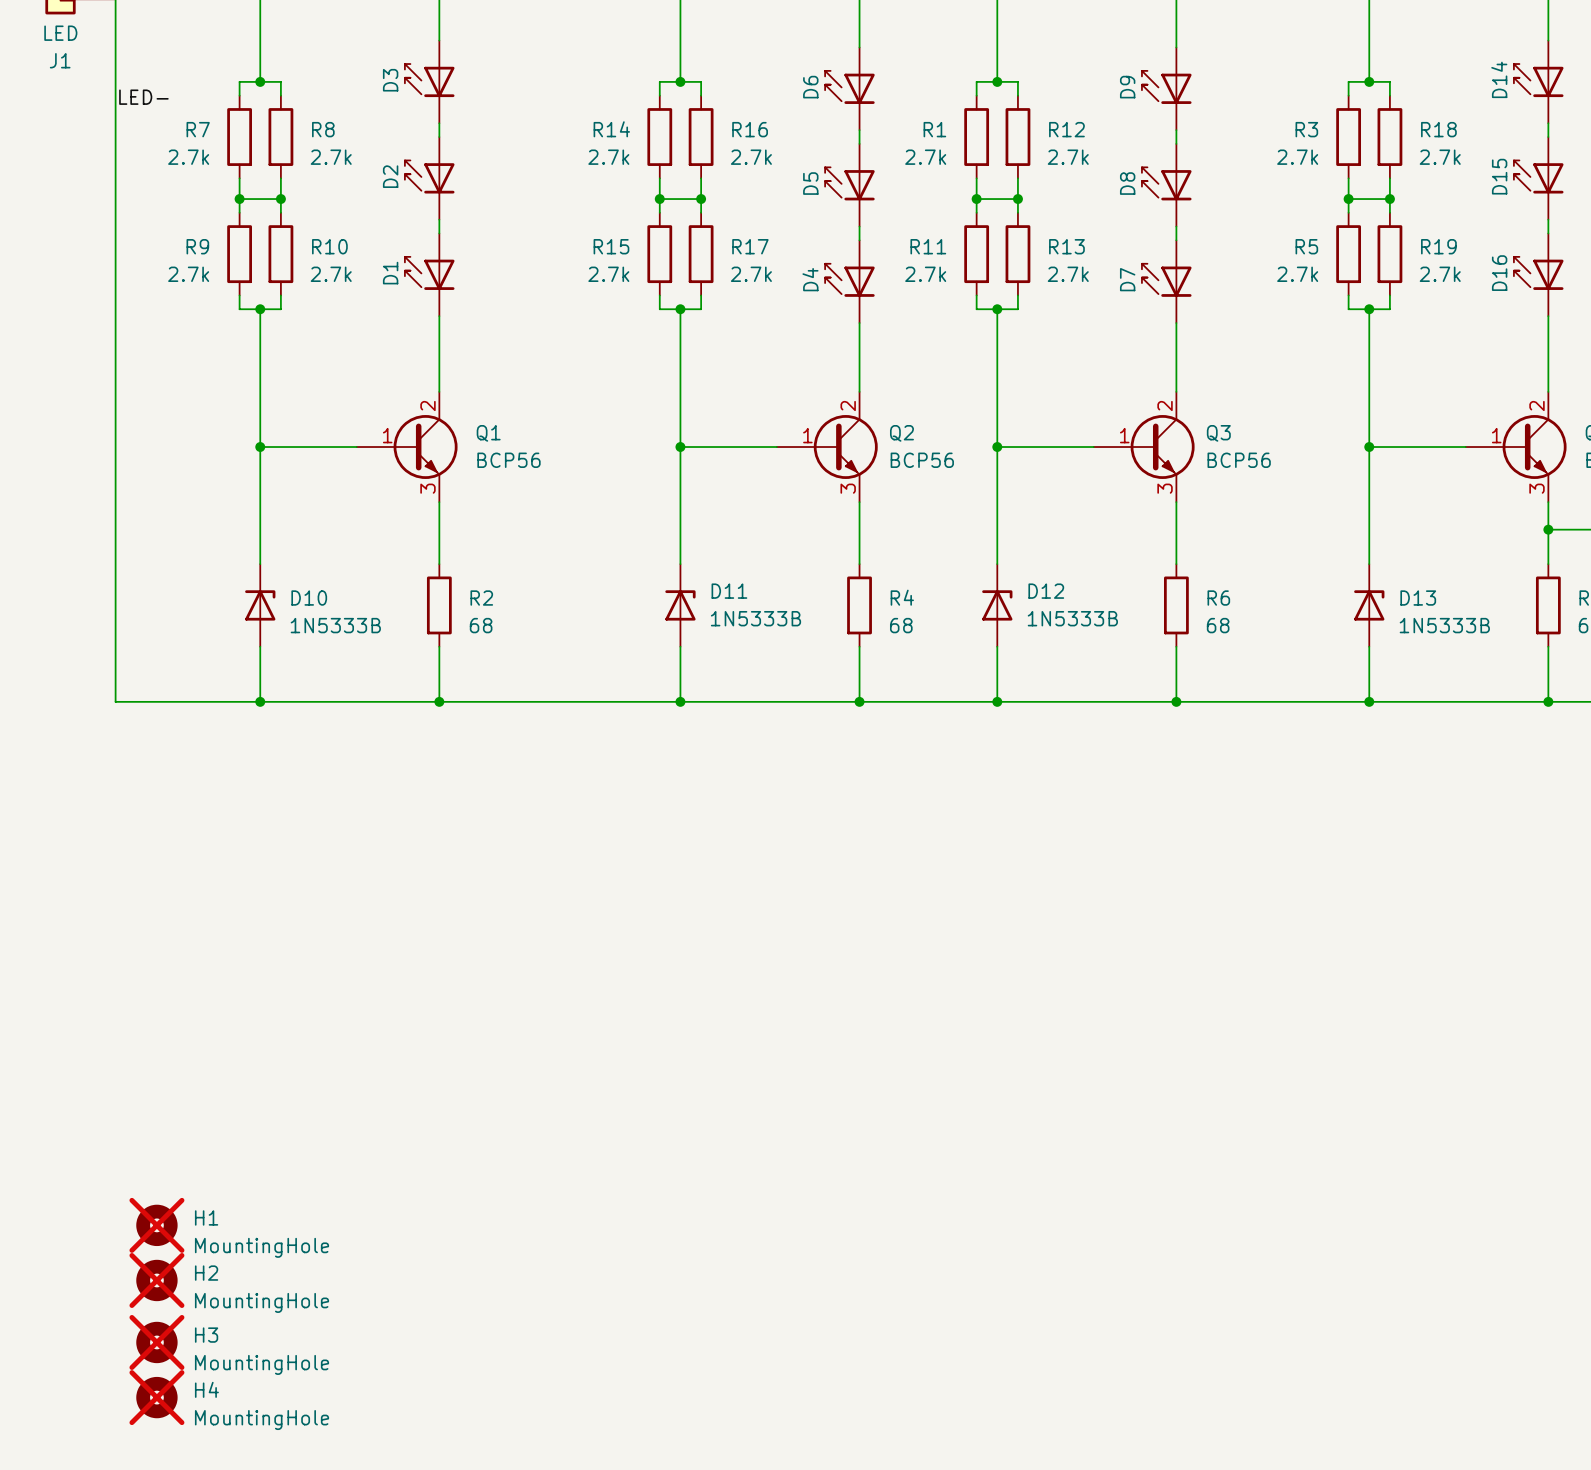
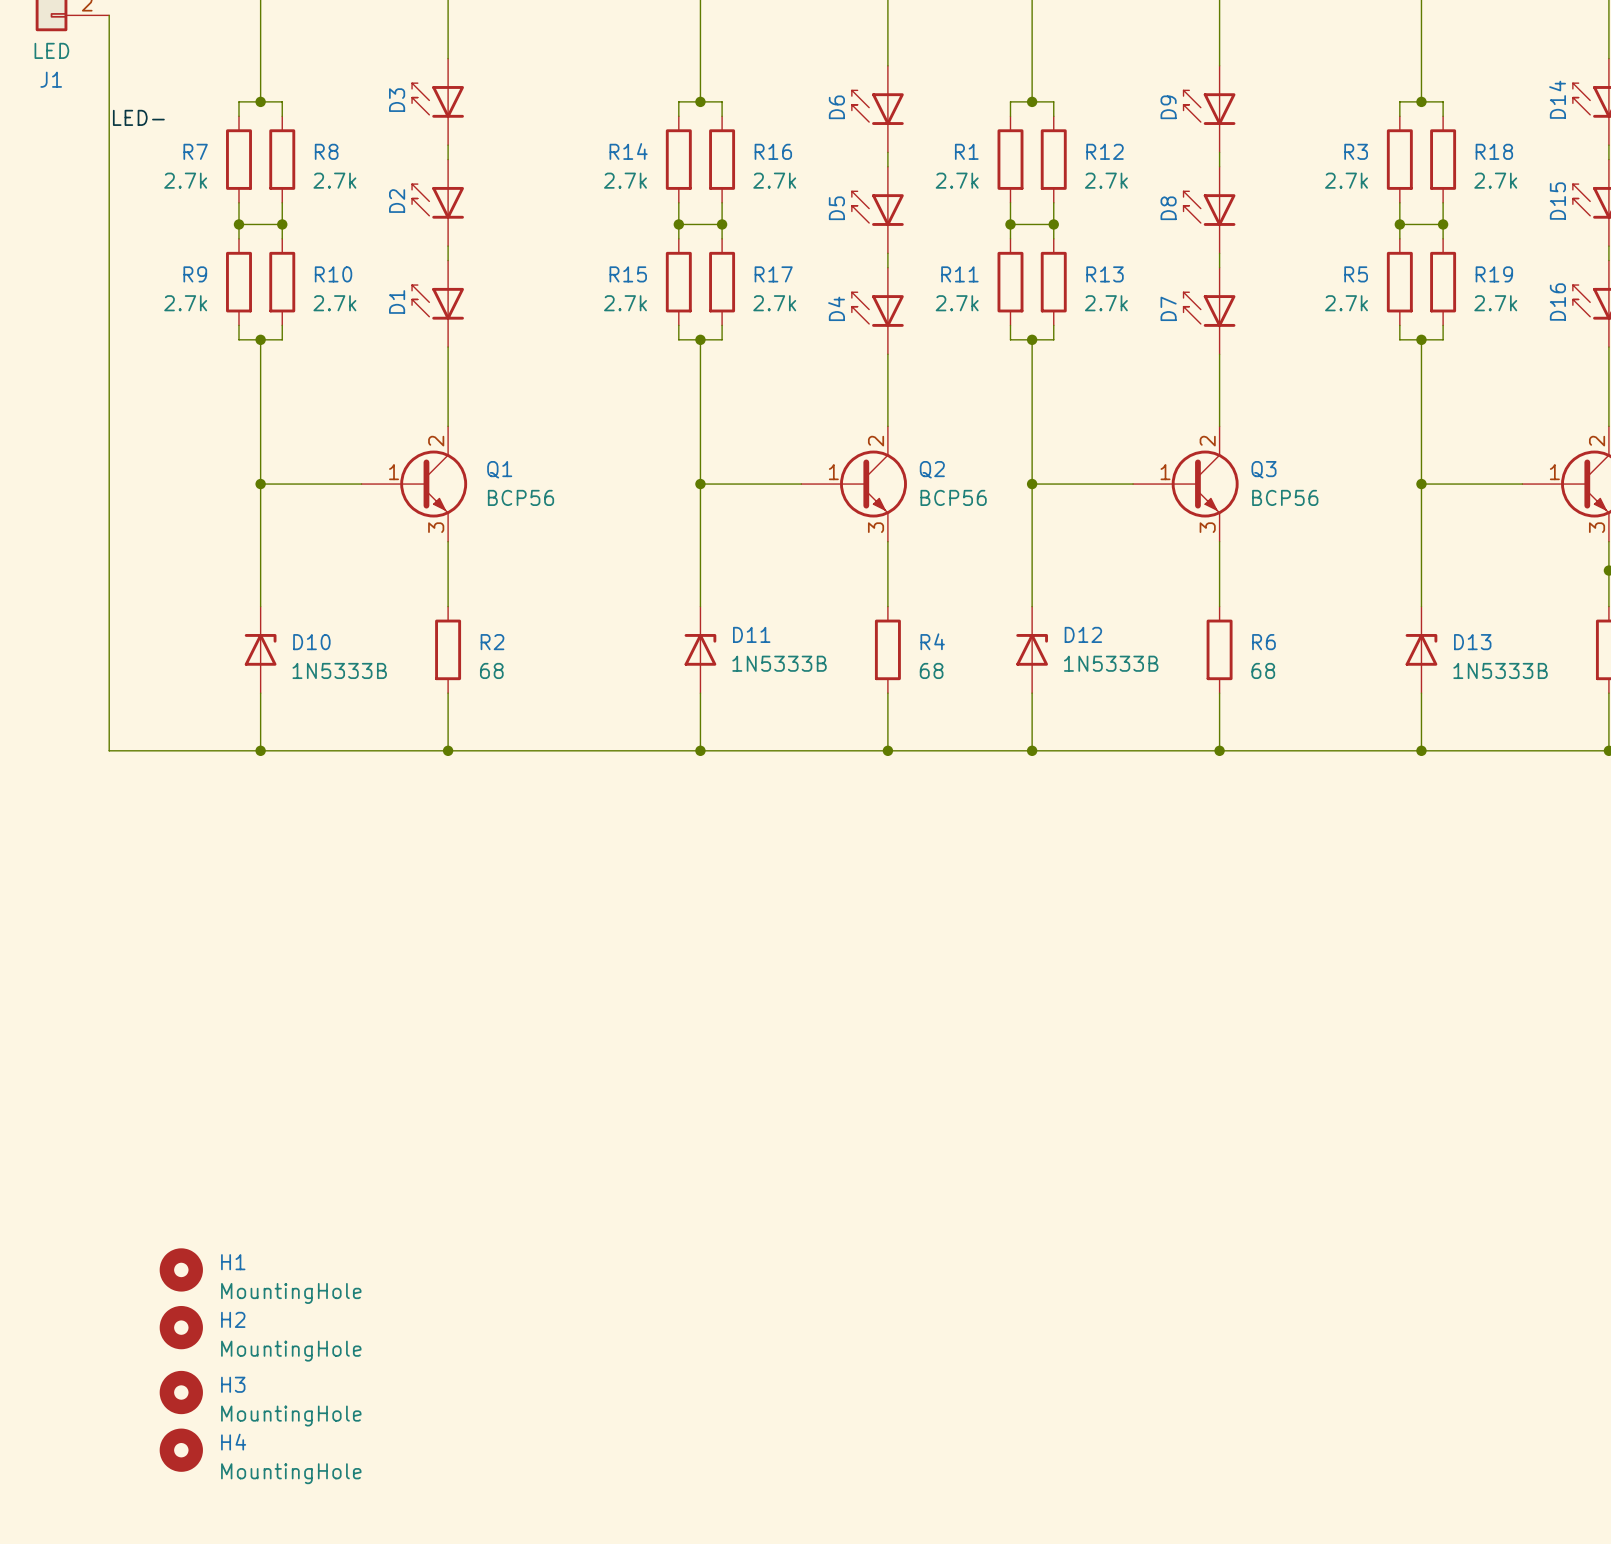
H1 position: (156, 1225) -> (181, 1269)
H1 do-not-place cross: (156, 1225) -> none
H2 position: (156, 1280) -> (181, 1327)
H2 do-not-place cross: (156, 1280) -> none
H3 position: (156, 1342) -> (181, 1392)
H3 do-not-place cross: (156, 1342) -> none
H4 position: (156, 1397) -> (181, 1450)
H4 do-not-place cross: (156, 1397) -> none

